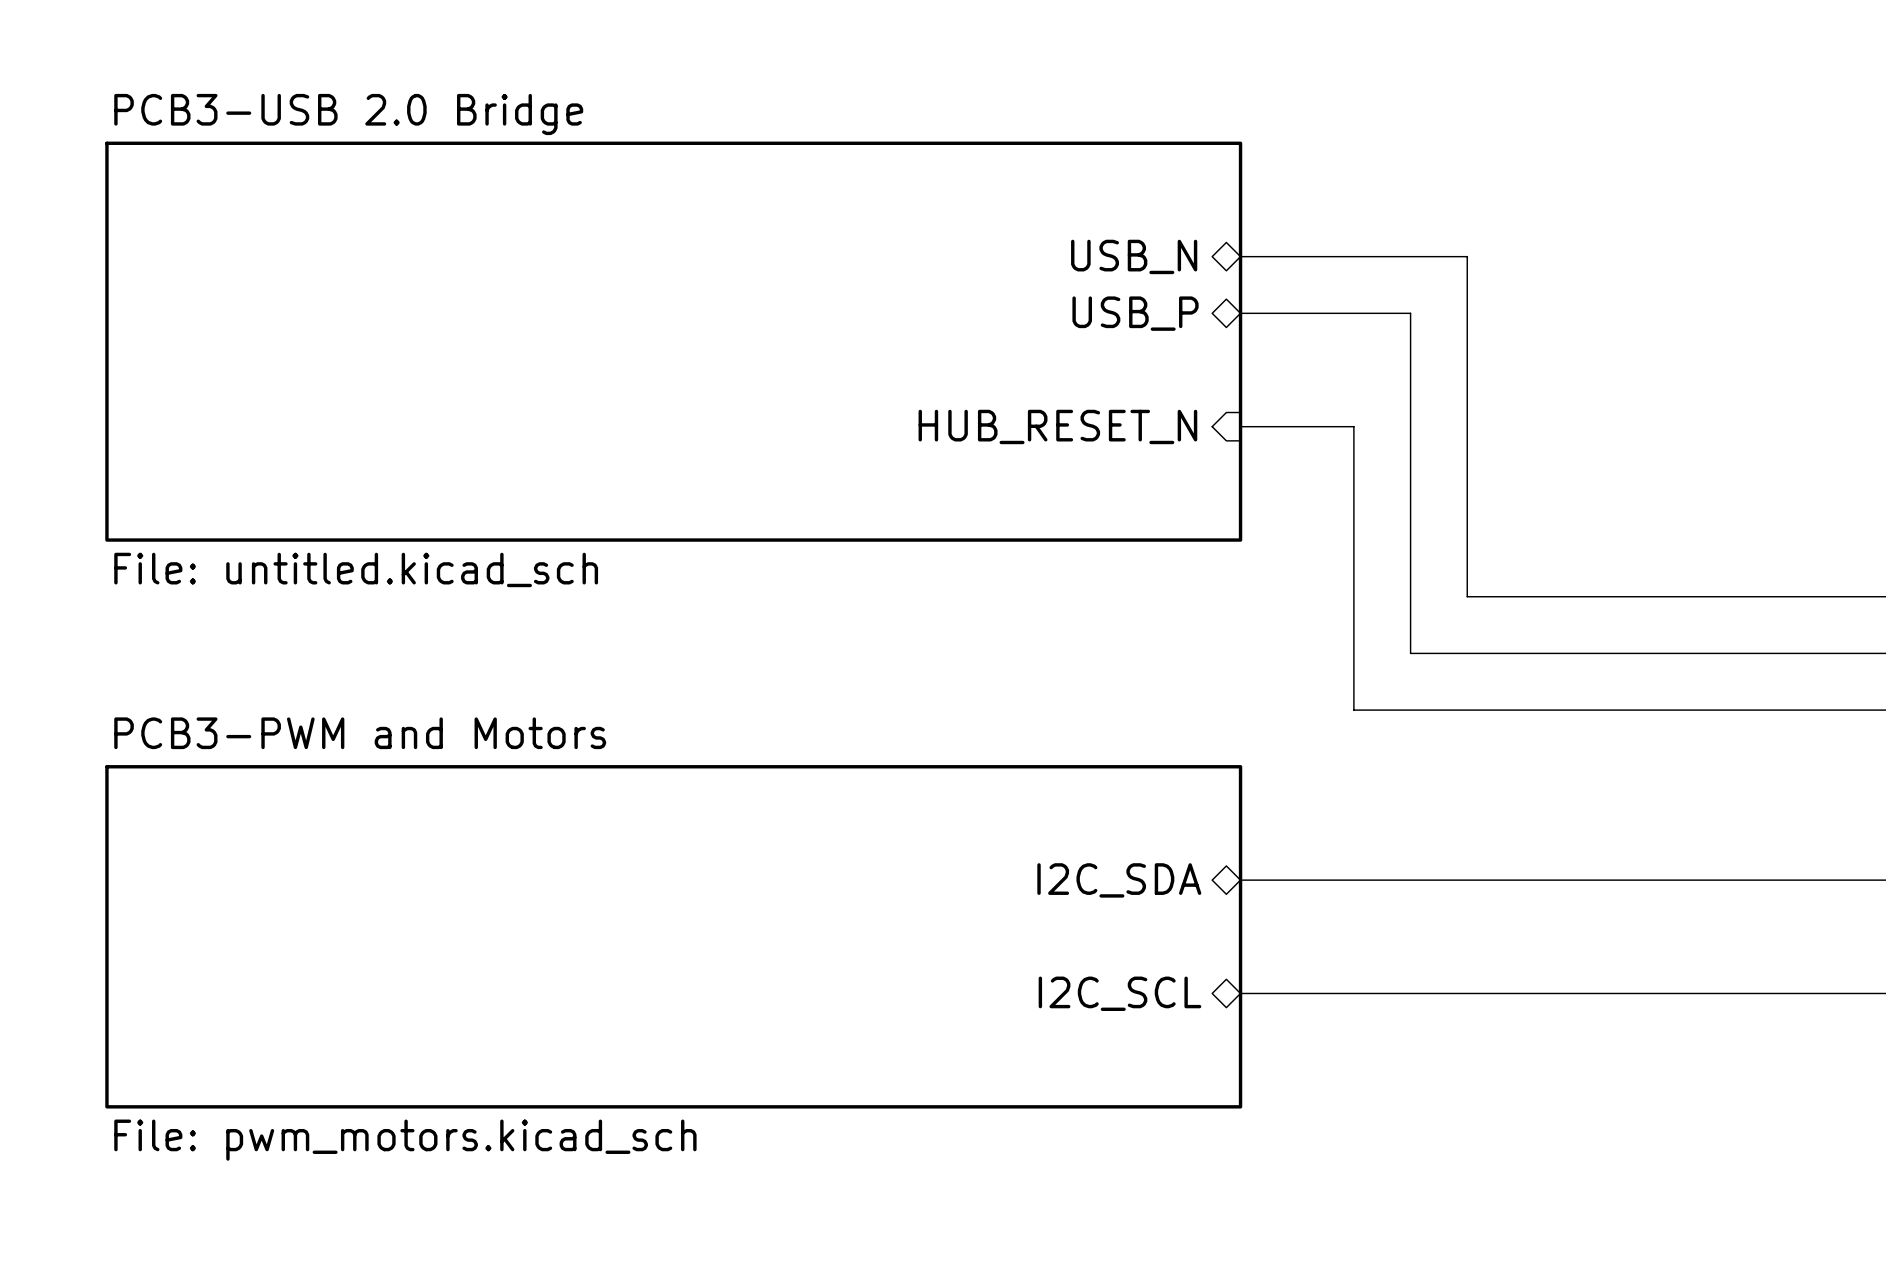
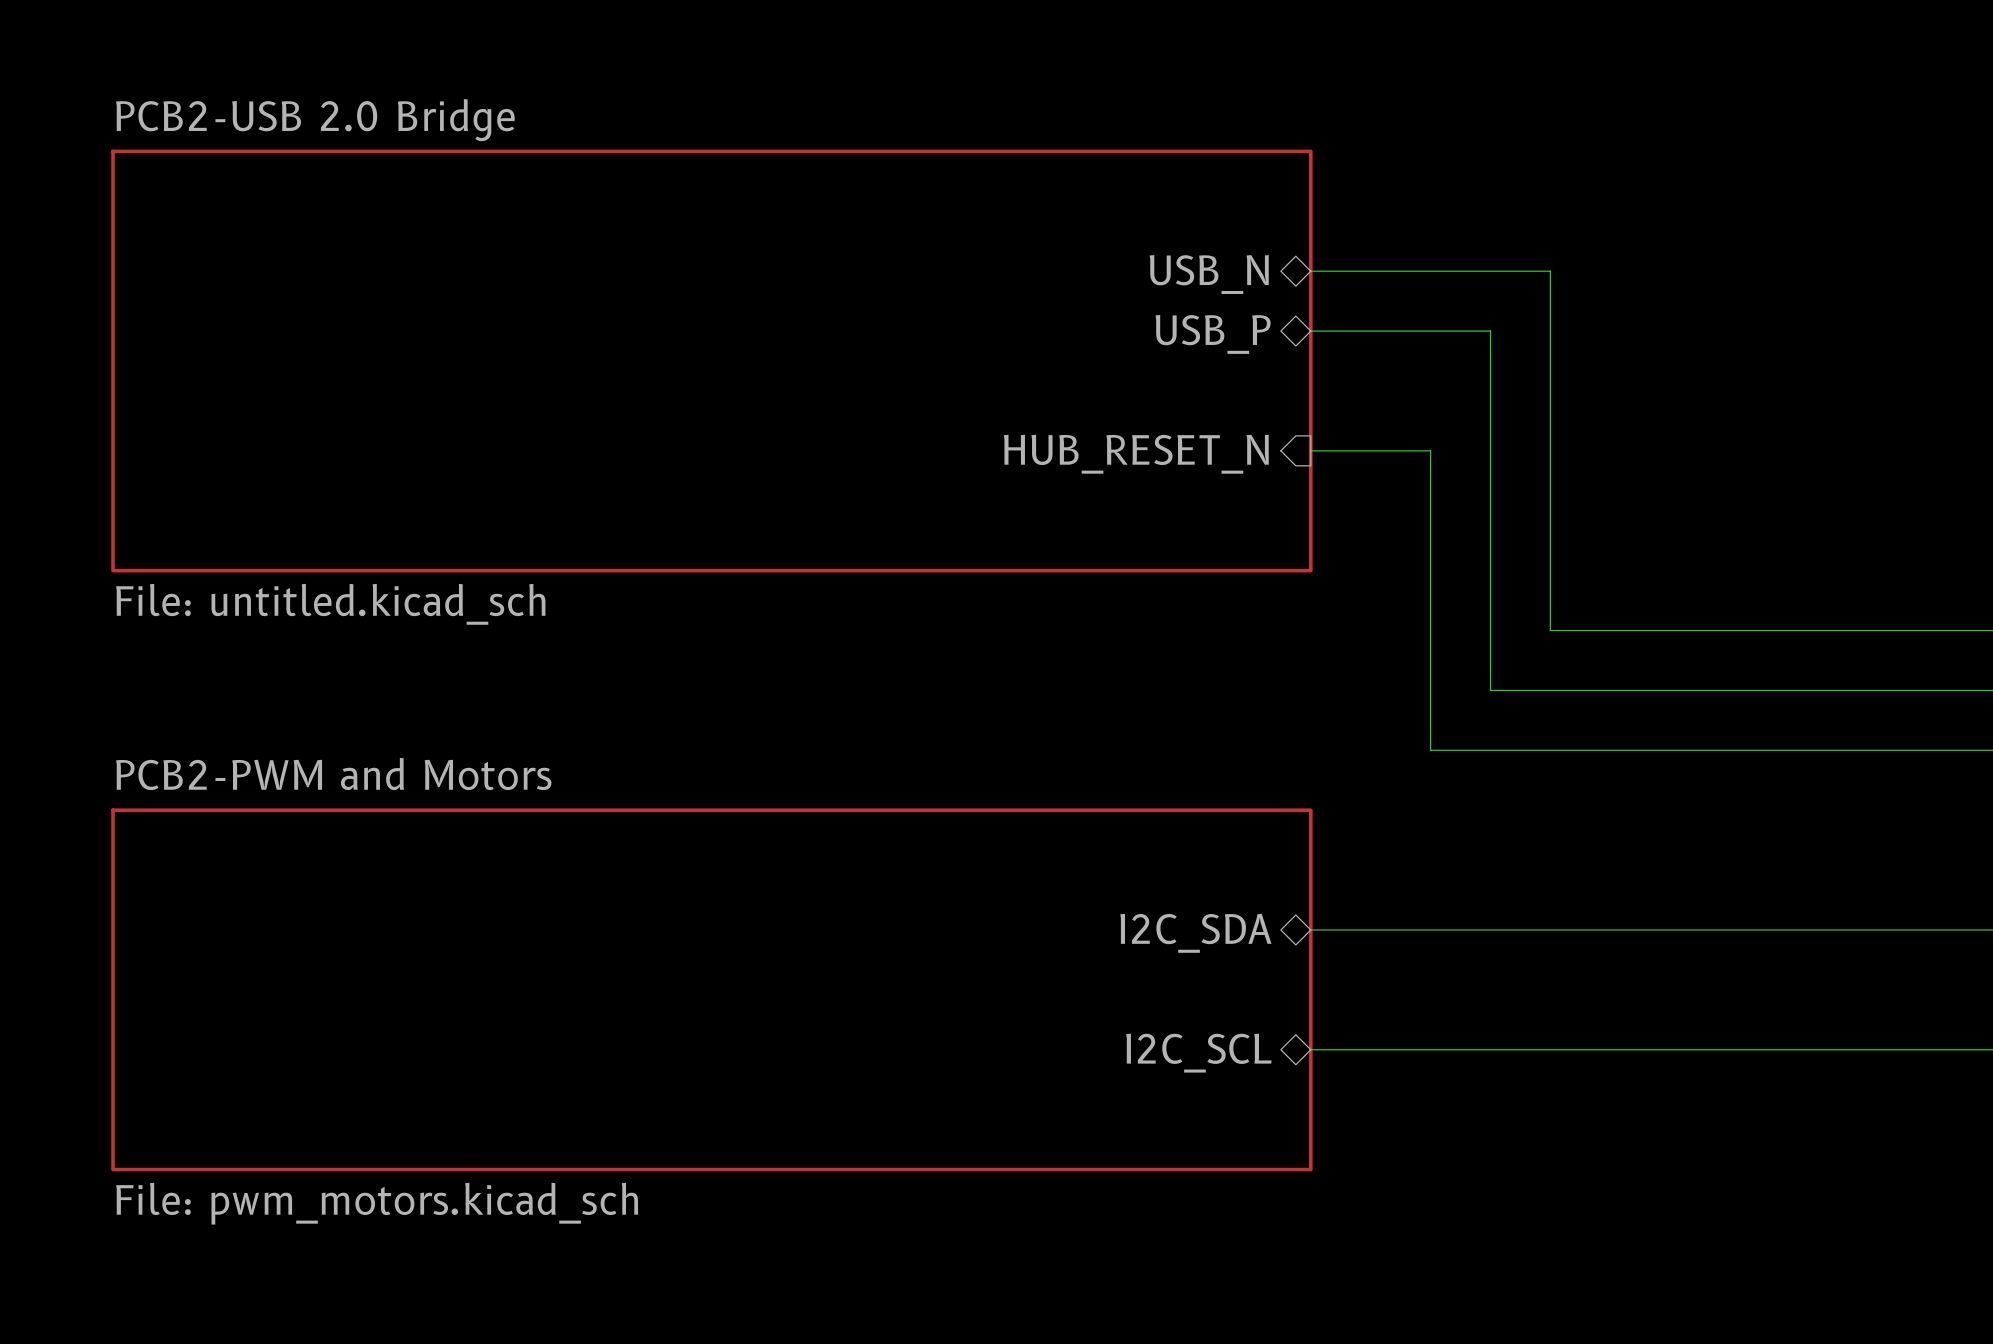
sheet PCB3-USB 2.0 Bridge name: PCB3-USB 2.0 Bridge (348, 114) -> PCB2-USB 2.0 Bridge (315, 120)
sheet PCB3-PWM and Motors name: PCB3-PWM and Motors (360, 733) -> PCB2-PWM and Motors (333, 773)

